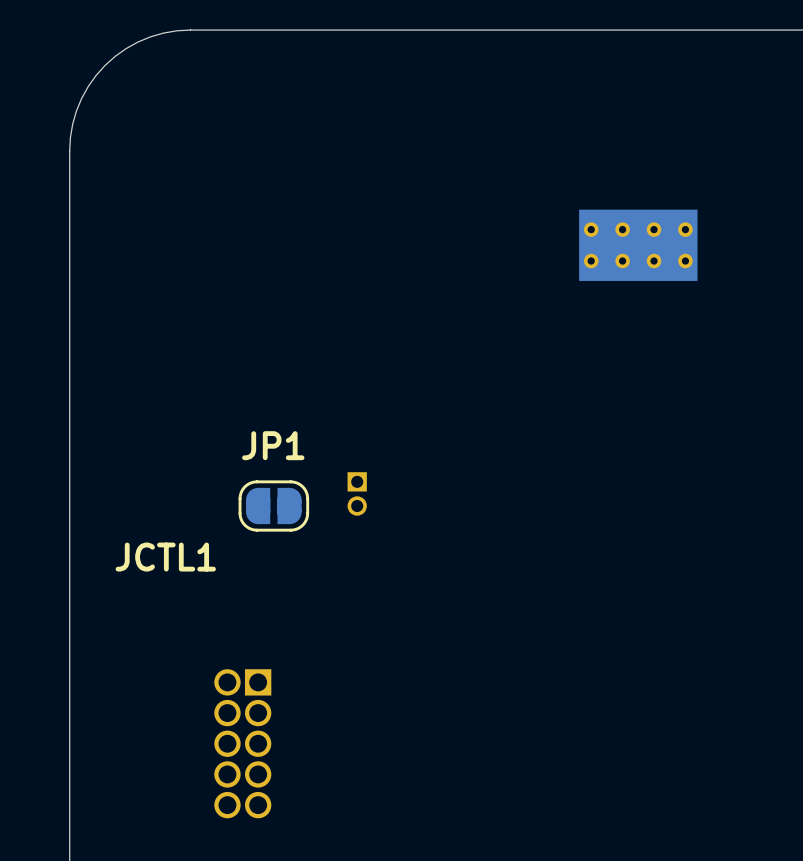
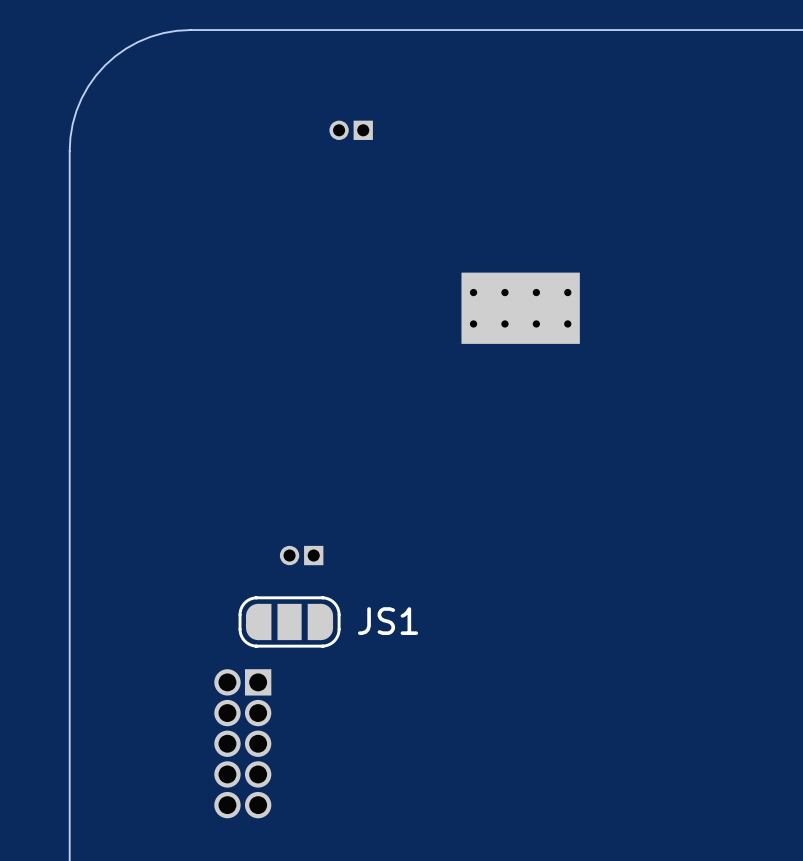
part: none -> (351, 130)
part position: (638, 245) -> (520, 308)
part rotation: 0° (357, 493) -> 90° clockwise (301, 555)
part position: (357, 493) -> (301, 555)
JP1: (273, 506) -> none
JCTL1 name: JCTL1 (165, 557) -> none
JS1: none -> (289, 621)

